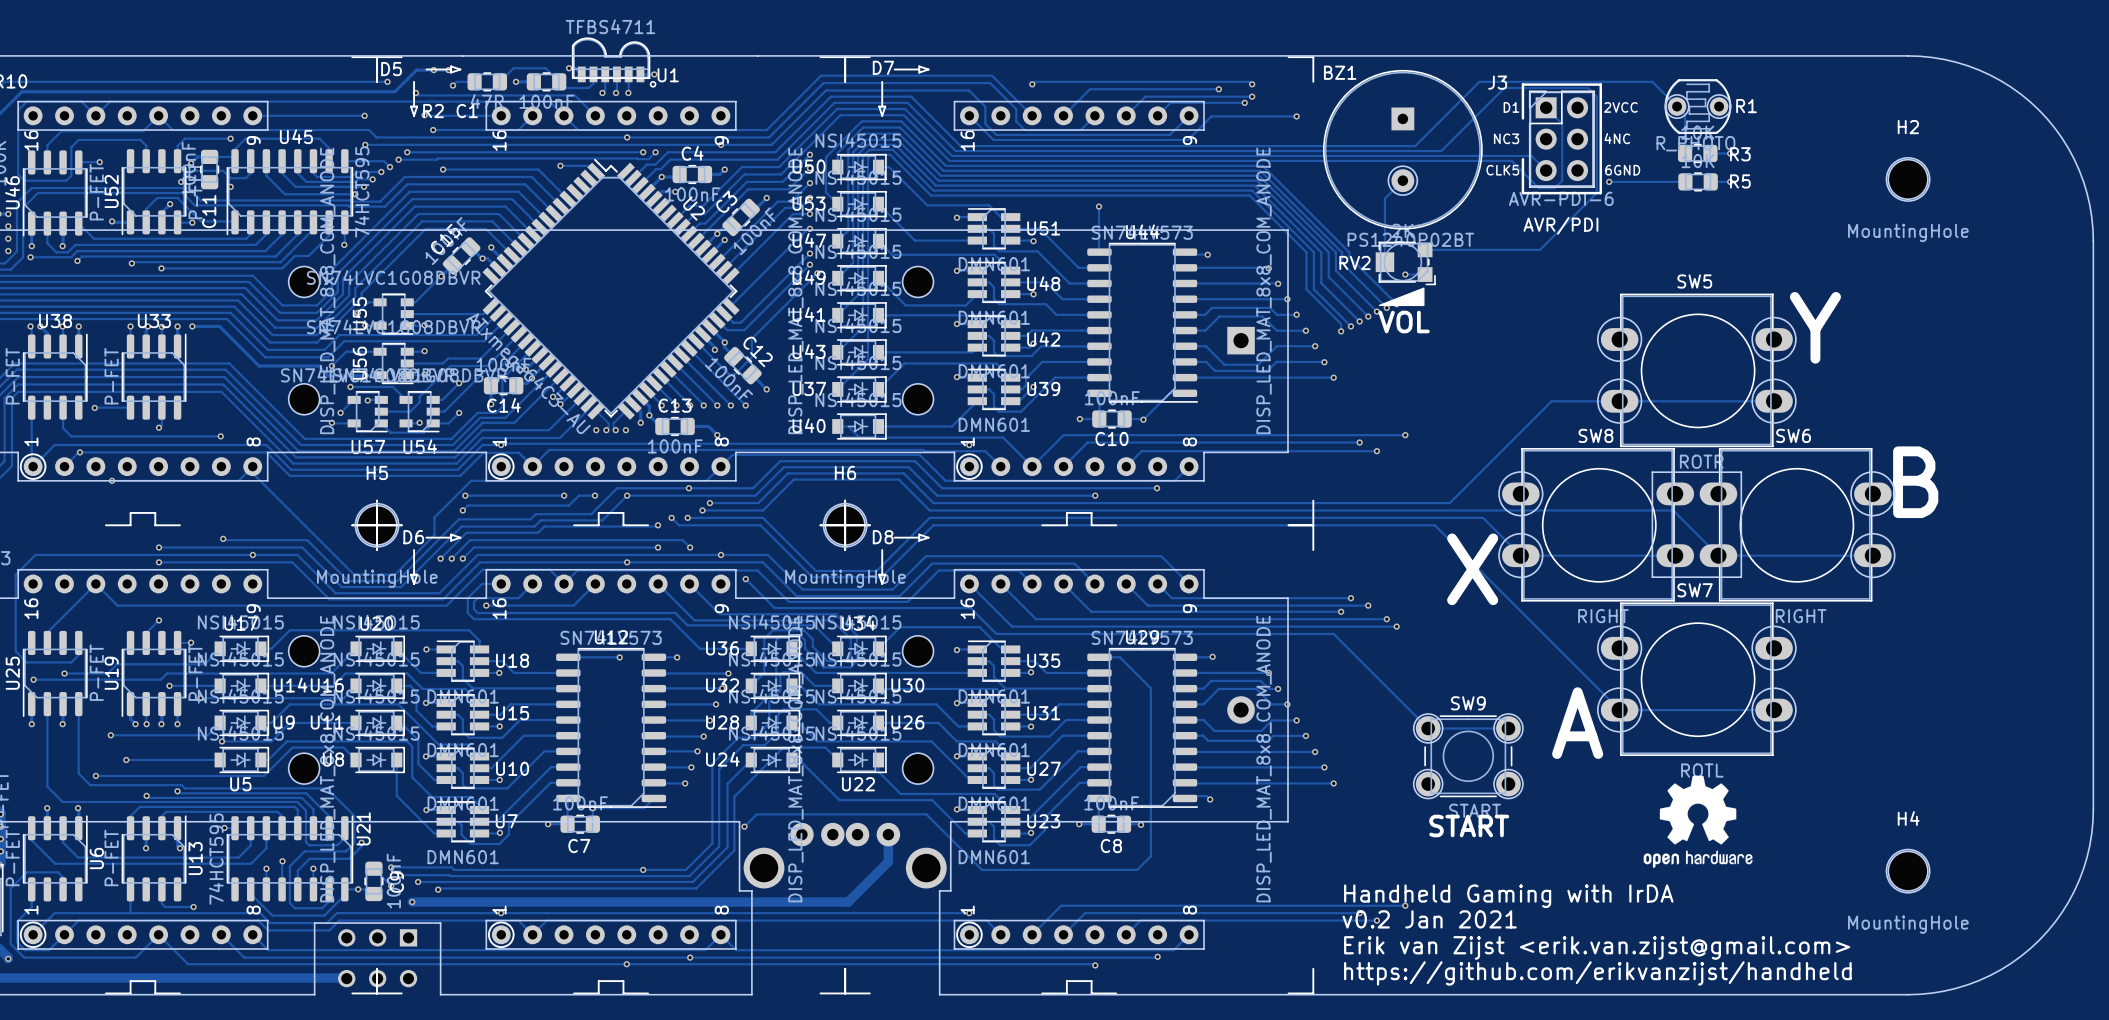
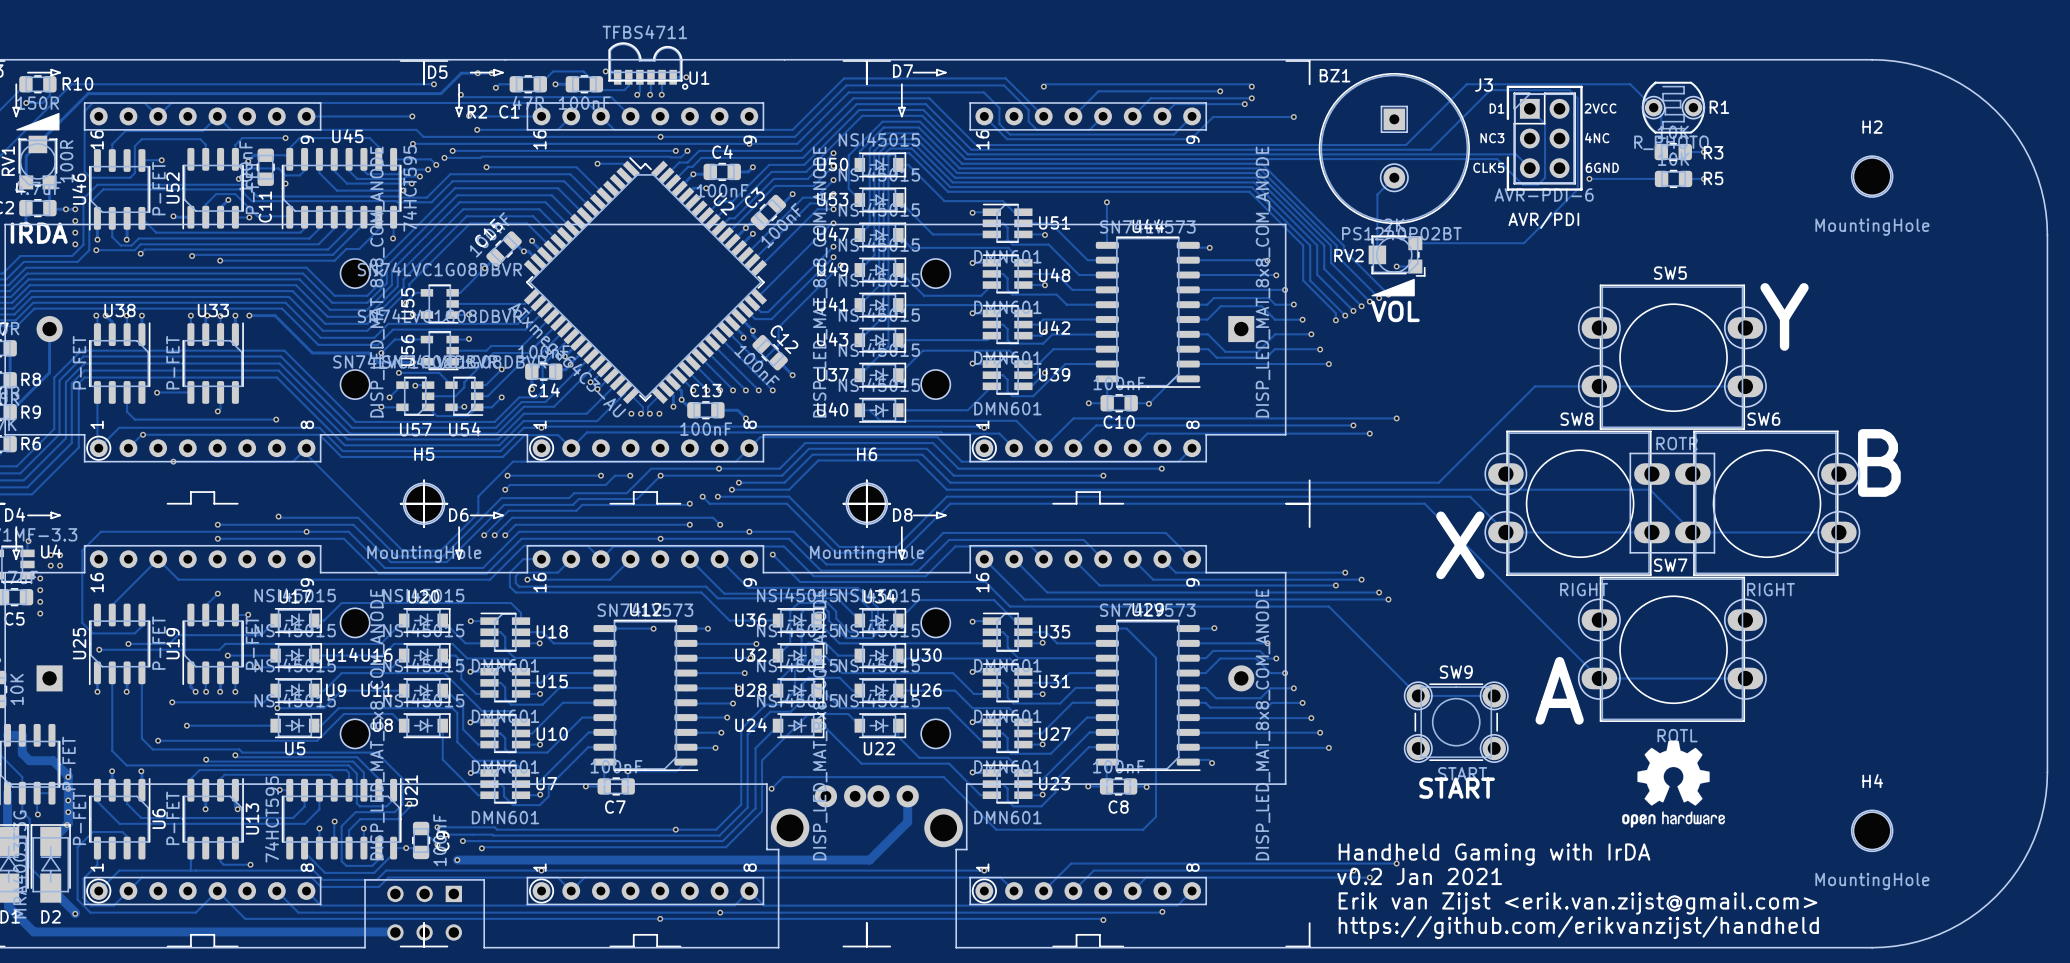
board edge: none -> (1381, 106) (1407, 106) (1407, 132) (1381, 132) (1381, 106)

